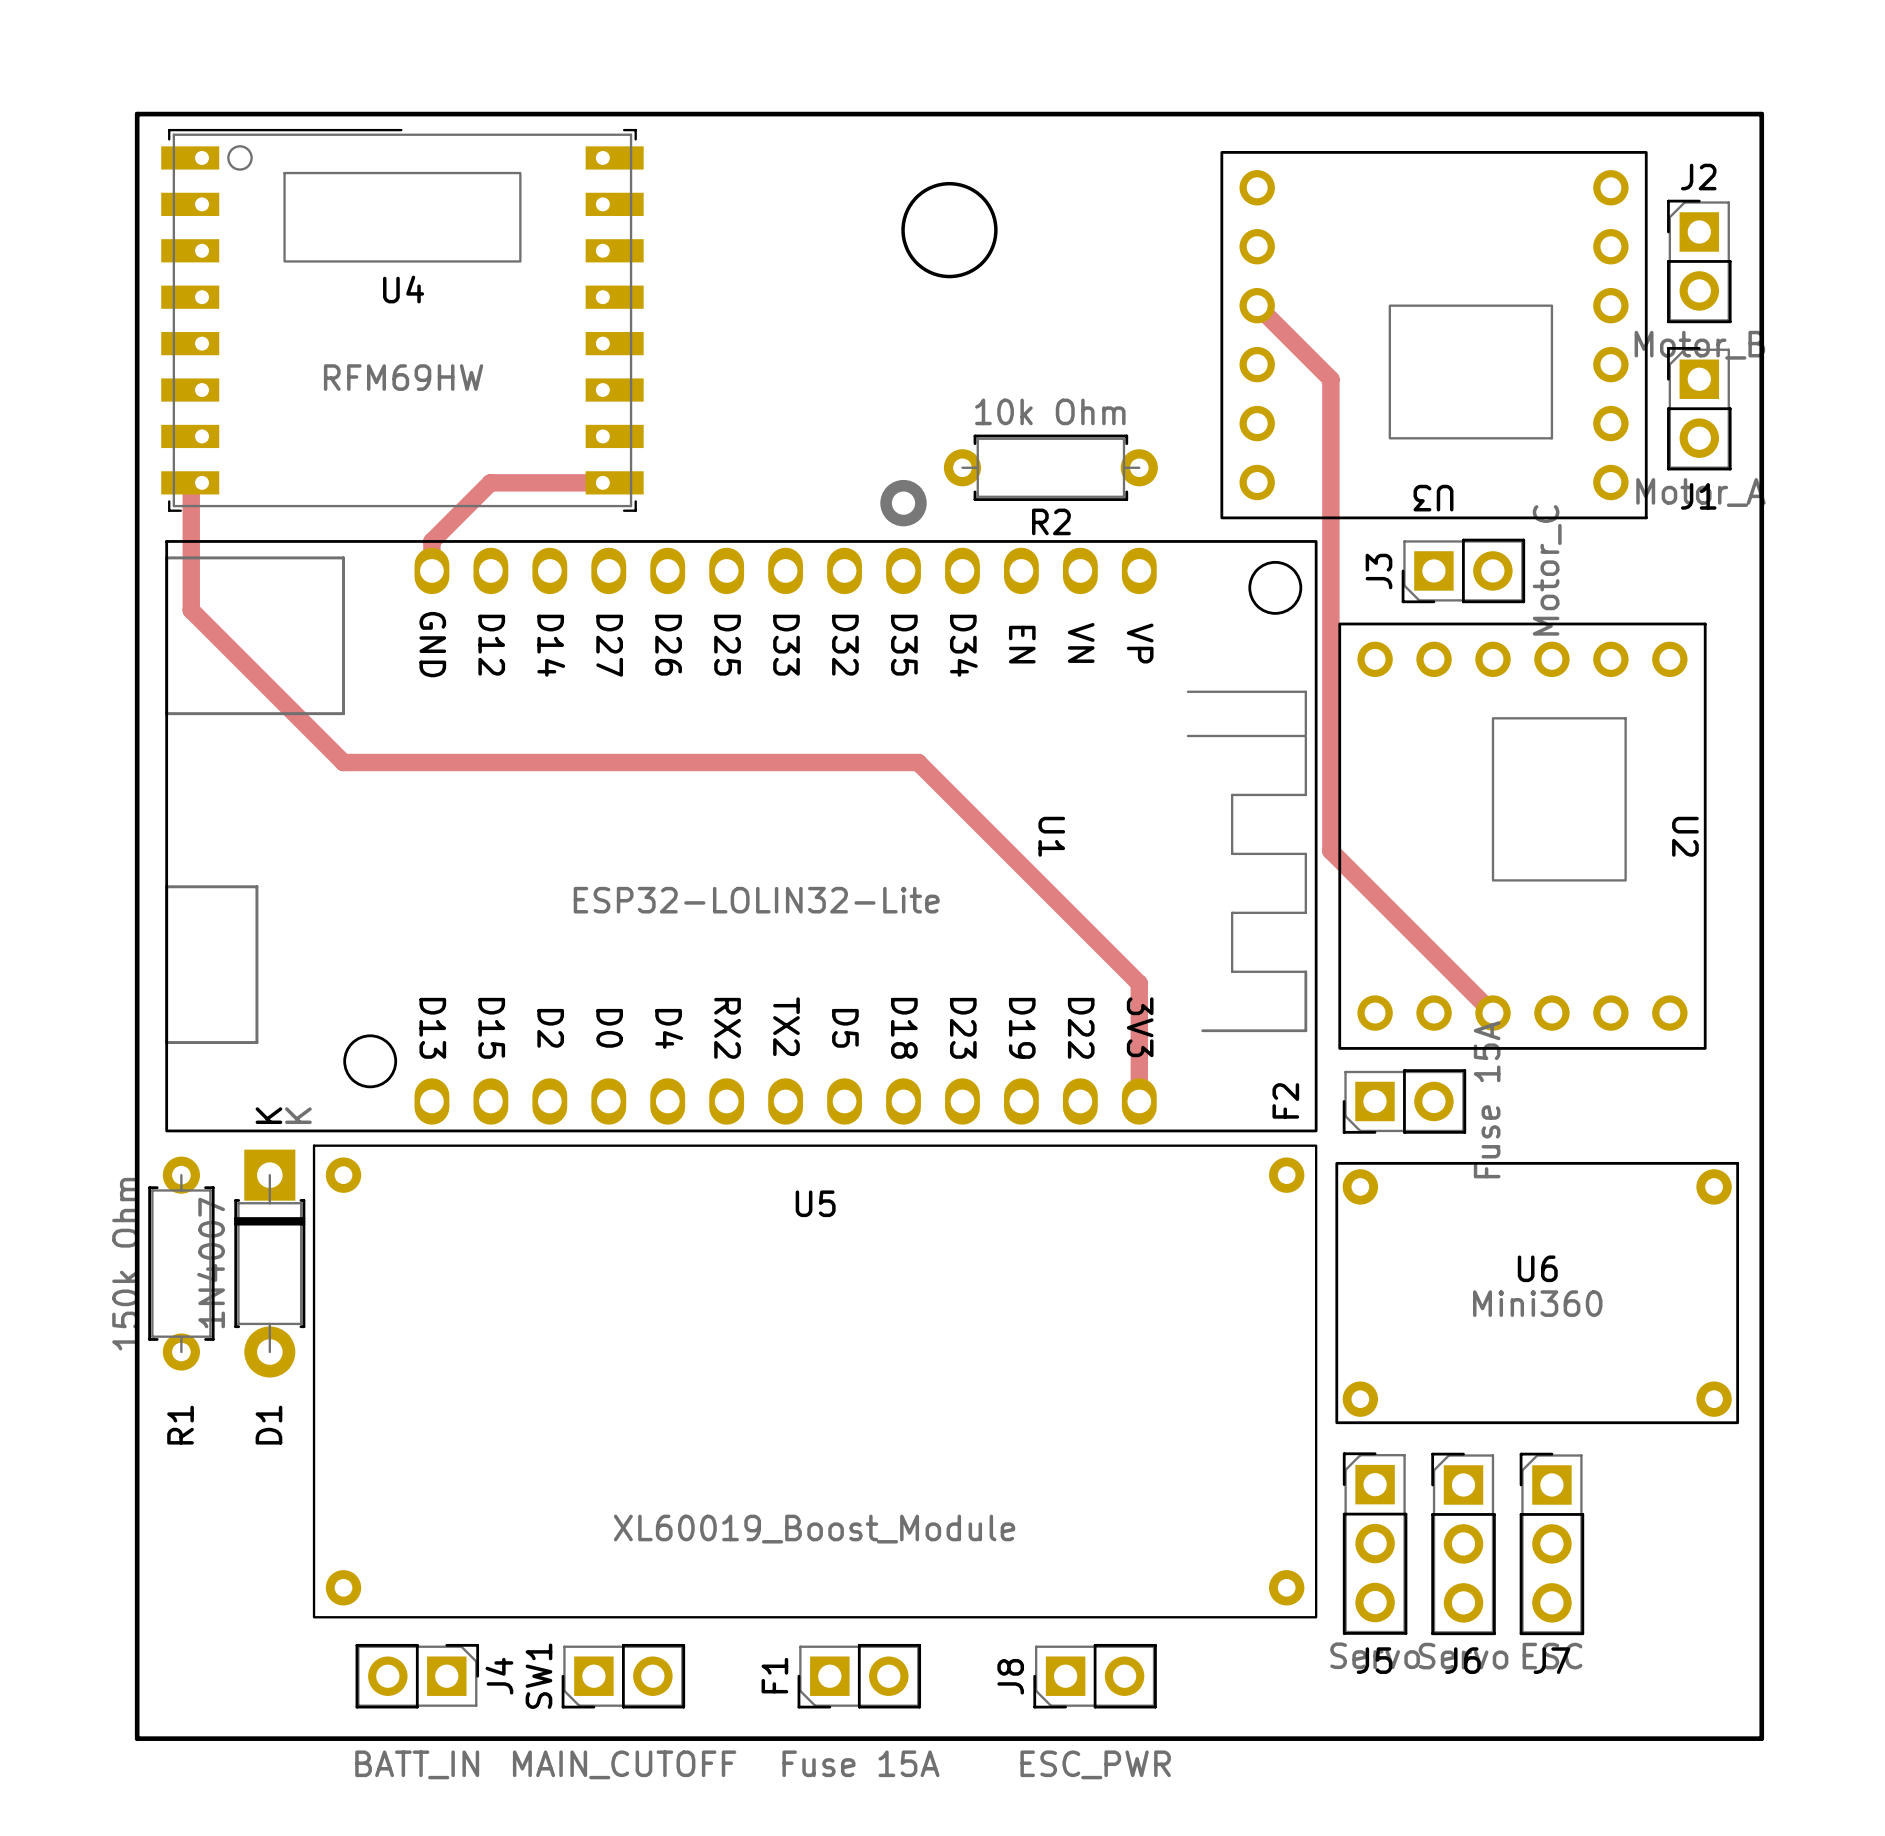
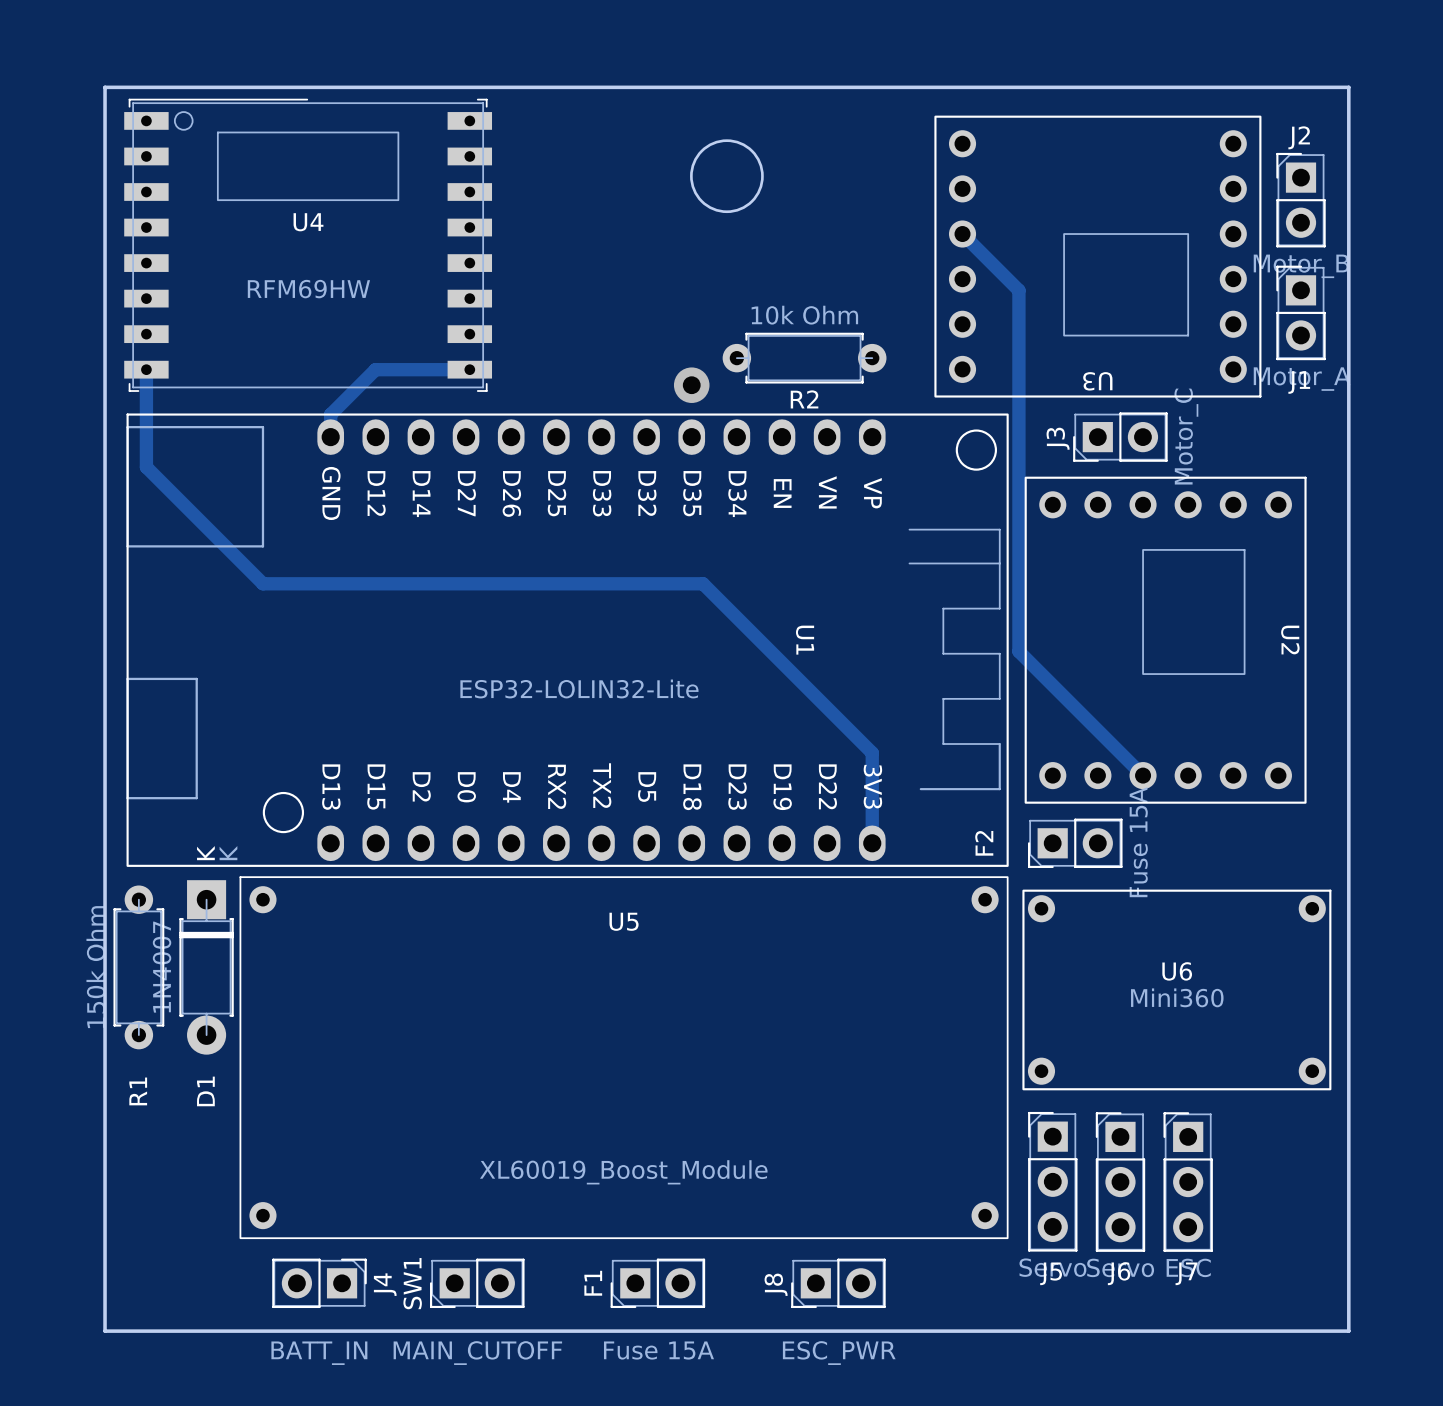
U4 footprint: [161, 128, 644, 512] -> [124, 98, 493, 392]

